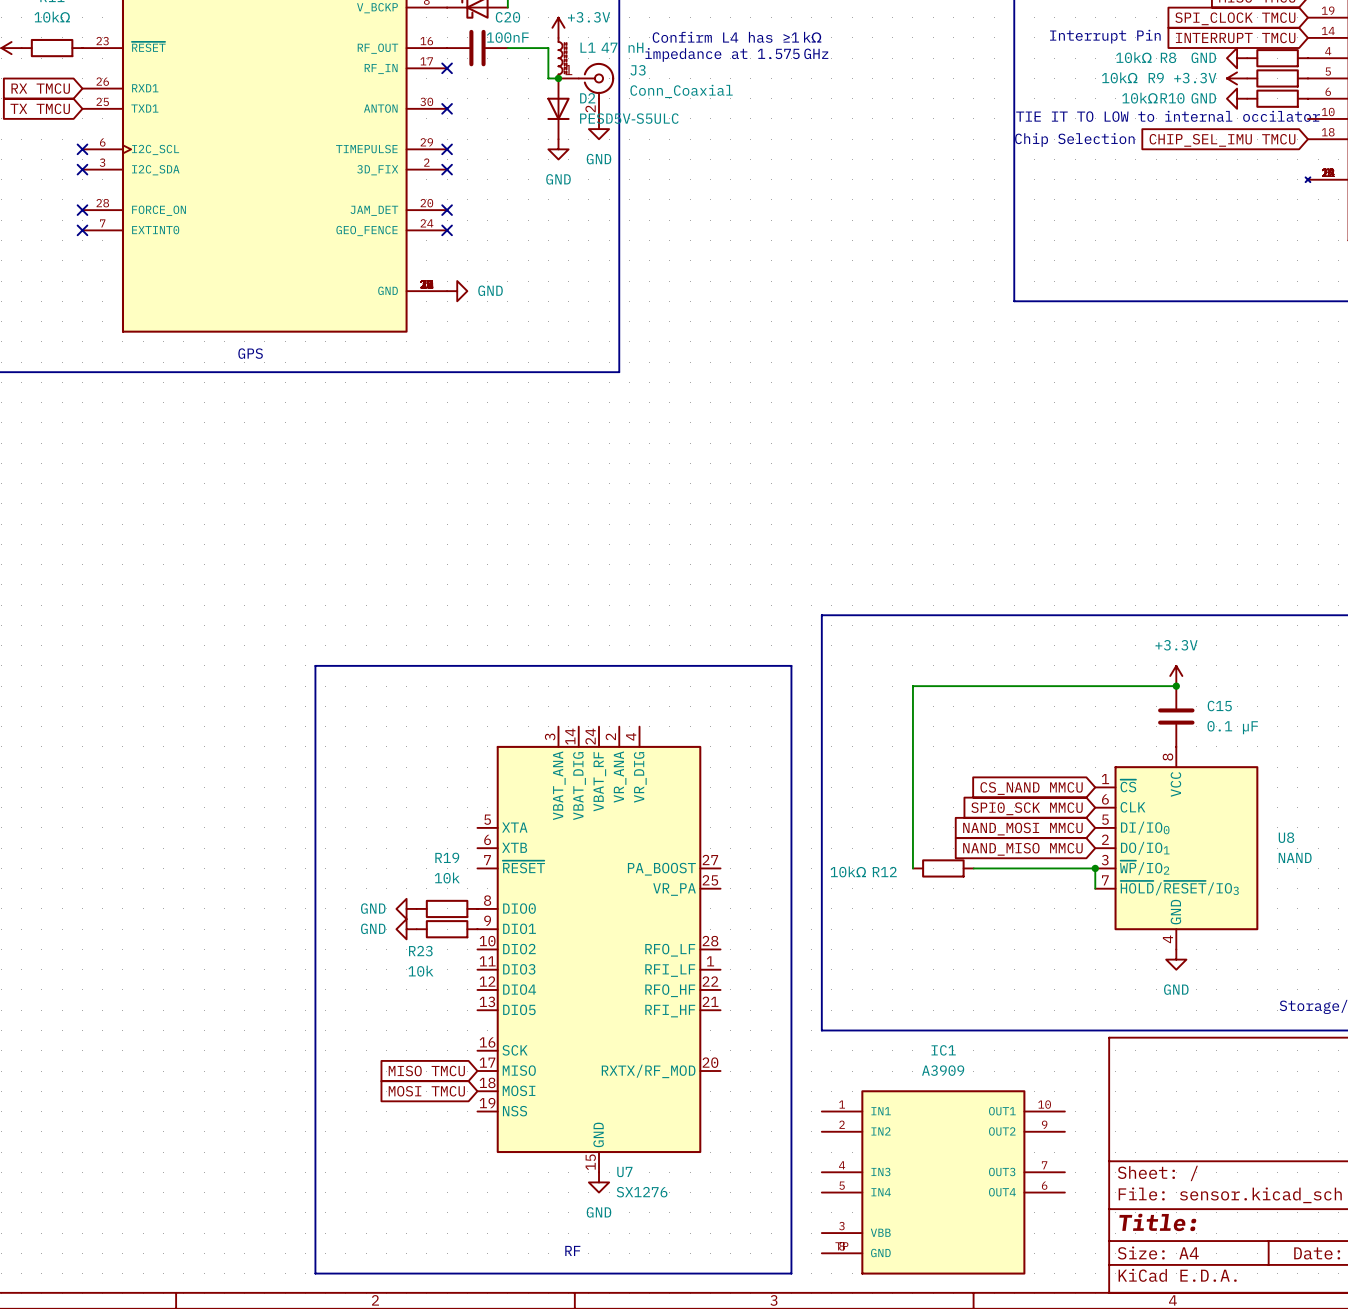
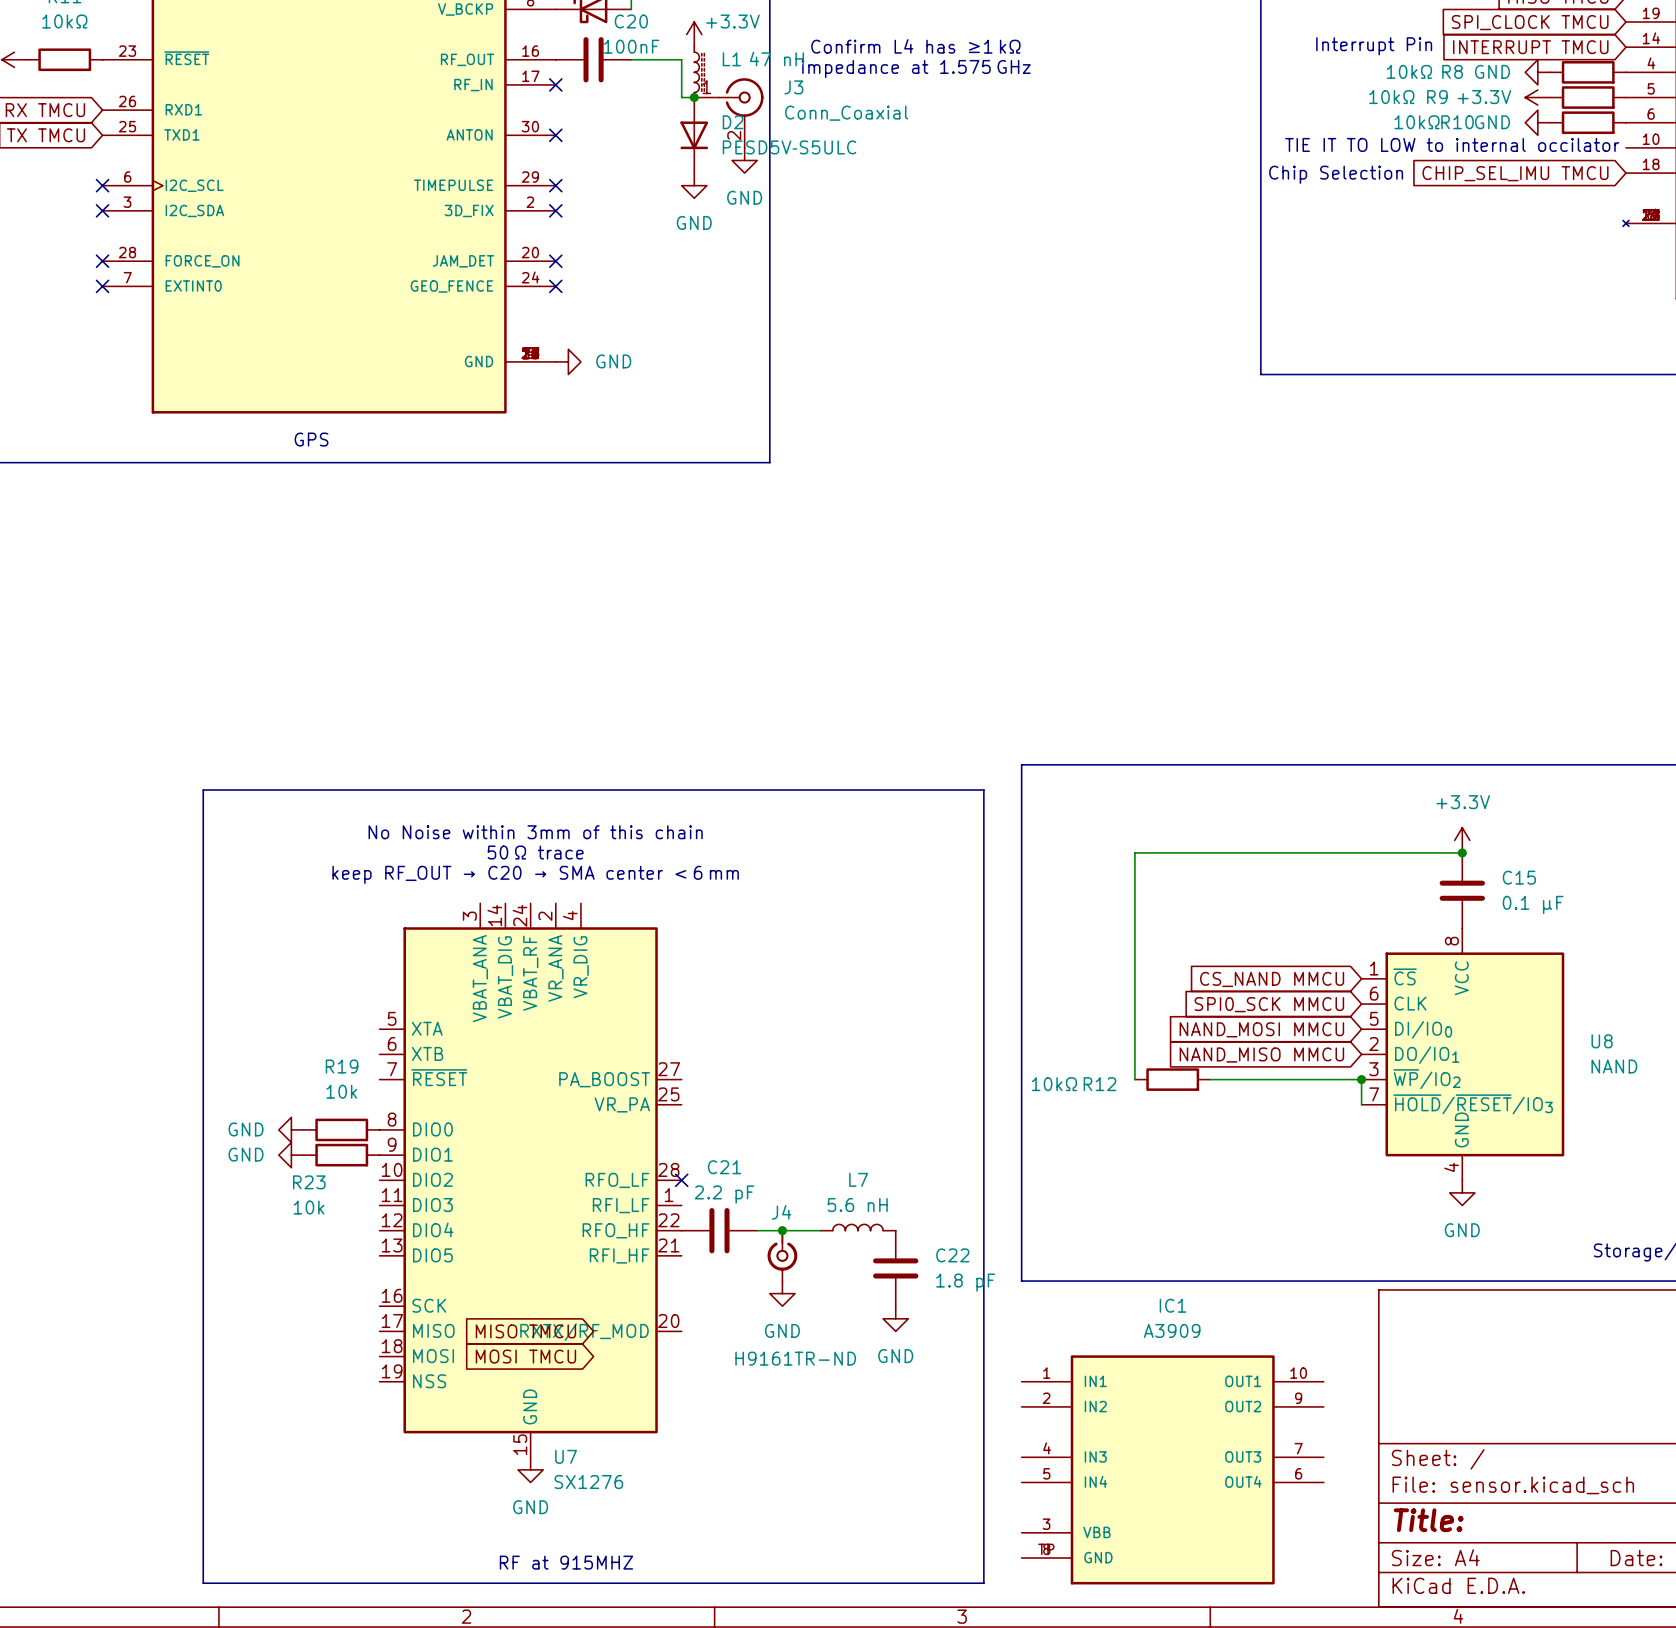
line: (791, 665) (315, 665) (315, 1273) -> (983, 827) (983, 790) (203, 790) (203, 1583) (392, 1583)
text: none -> No Noise within 3mm of this chain (535, 832)
text: none -> 50 Ω trace (535, 852)
text: none -> keep RF_OUT → C20 → SMA center < 6 mm (535, 874)
power symbol: none -> GND (291, 1129)
power symbol: GND (406, 908) -> none
R19 position: (447, 908) -> (341, 1129)
power symbol: none -> GND (291, 1155)
power symbol: GND (406, 929) -> none
R23 position: (447, 929) -> (341, 1155)
no-connect mark: none -> (681, 1180)
U7 position: (599, 949) -> (530, 1180)
L7: none -> 5.6 nH (857, 1227)
C21: none -> 2.2 pF (719, 1230)
junction: none -> (782, 1230)
J4: none -> H9161TR-ND (782, 1255)
C22: none -> 1.8 pF (895, 1268)
power symbol: none -> GND (782, 1293)
power symbol: none -> GND (895, 1318)
power symbol: none -> GND (530, 1469)
power symbol: GND (599, 1182) -> none
text: RF (572, 1250) -> none
text: none -> RF at 915MHZ (566, 1562)

